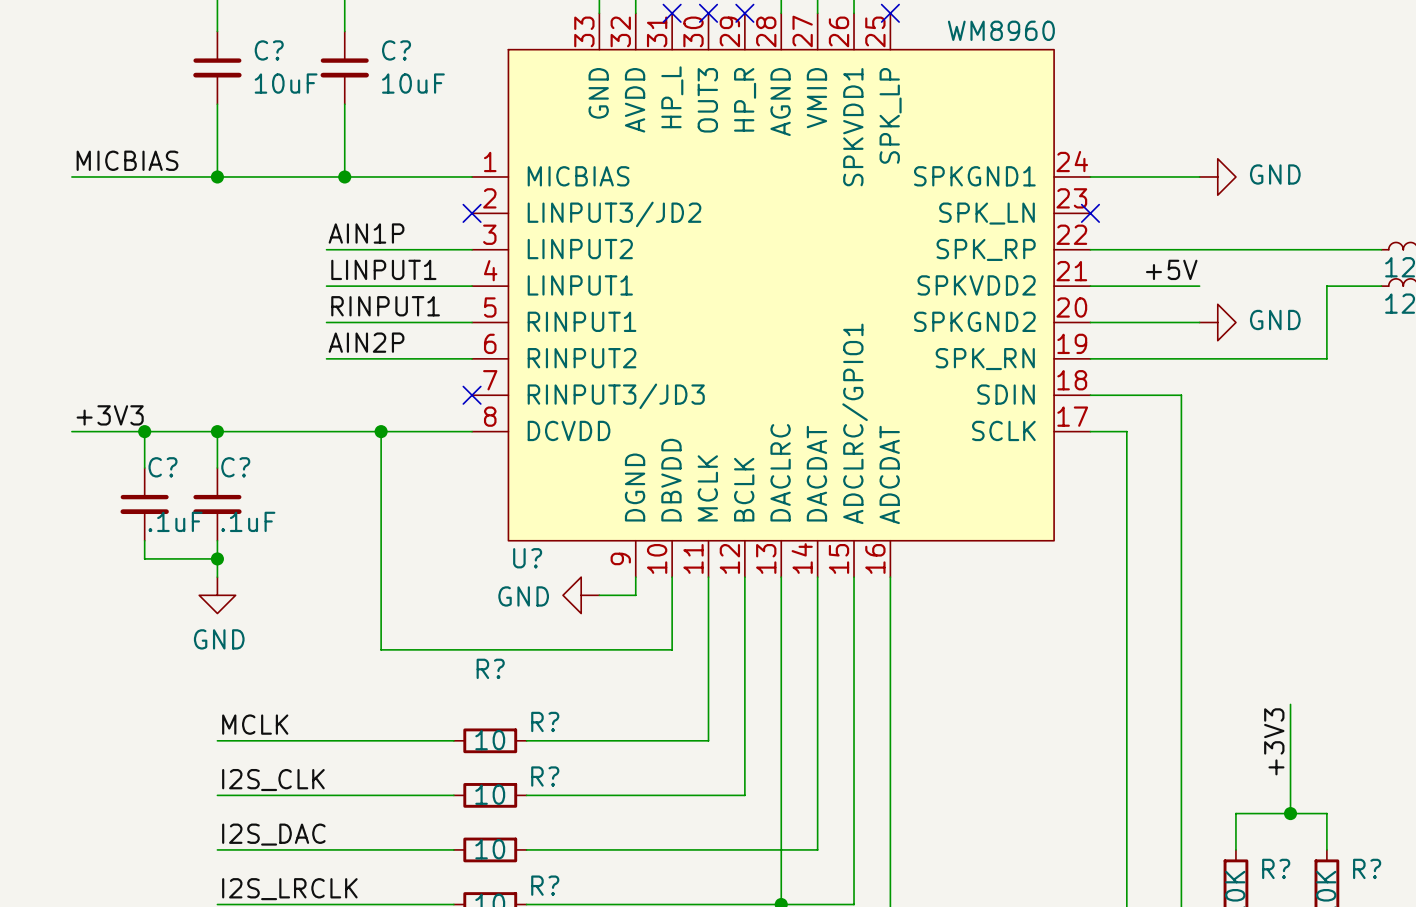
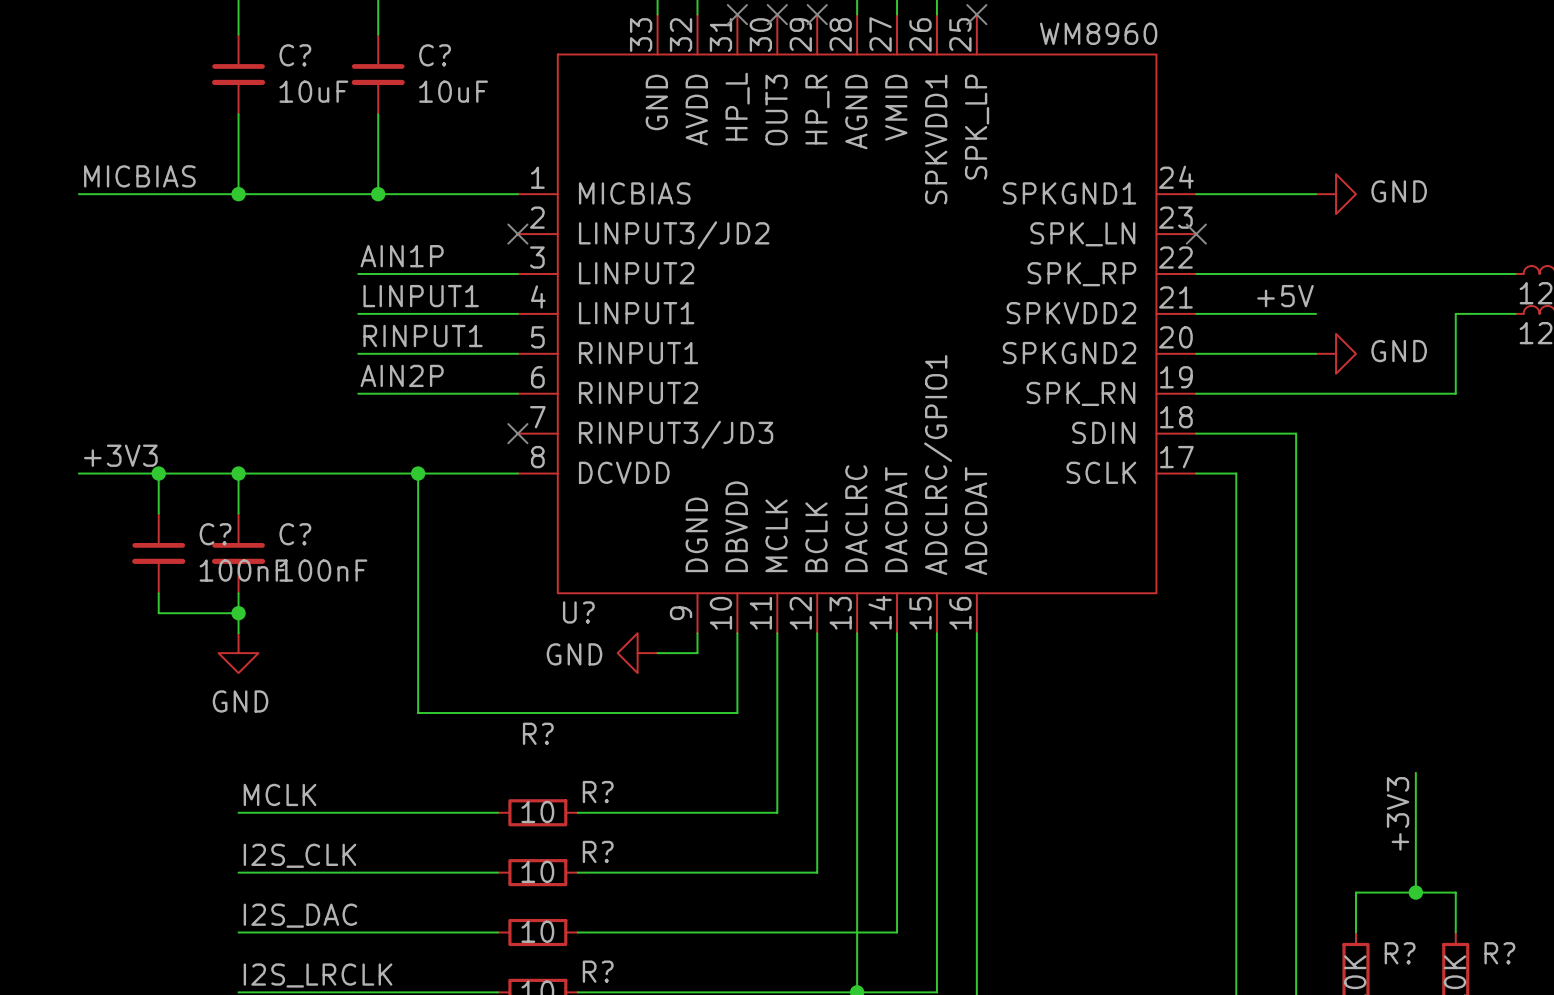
C? name position: C? (162, 467) -> C? (215, 534)
C? name position: C? (235, 467) -> C? (295, 534)
C? value: .1uF (175, 521) -> 100nF (243, 570)
C? value: .1uF (248, 521) -> 100nF (323, 570)

